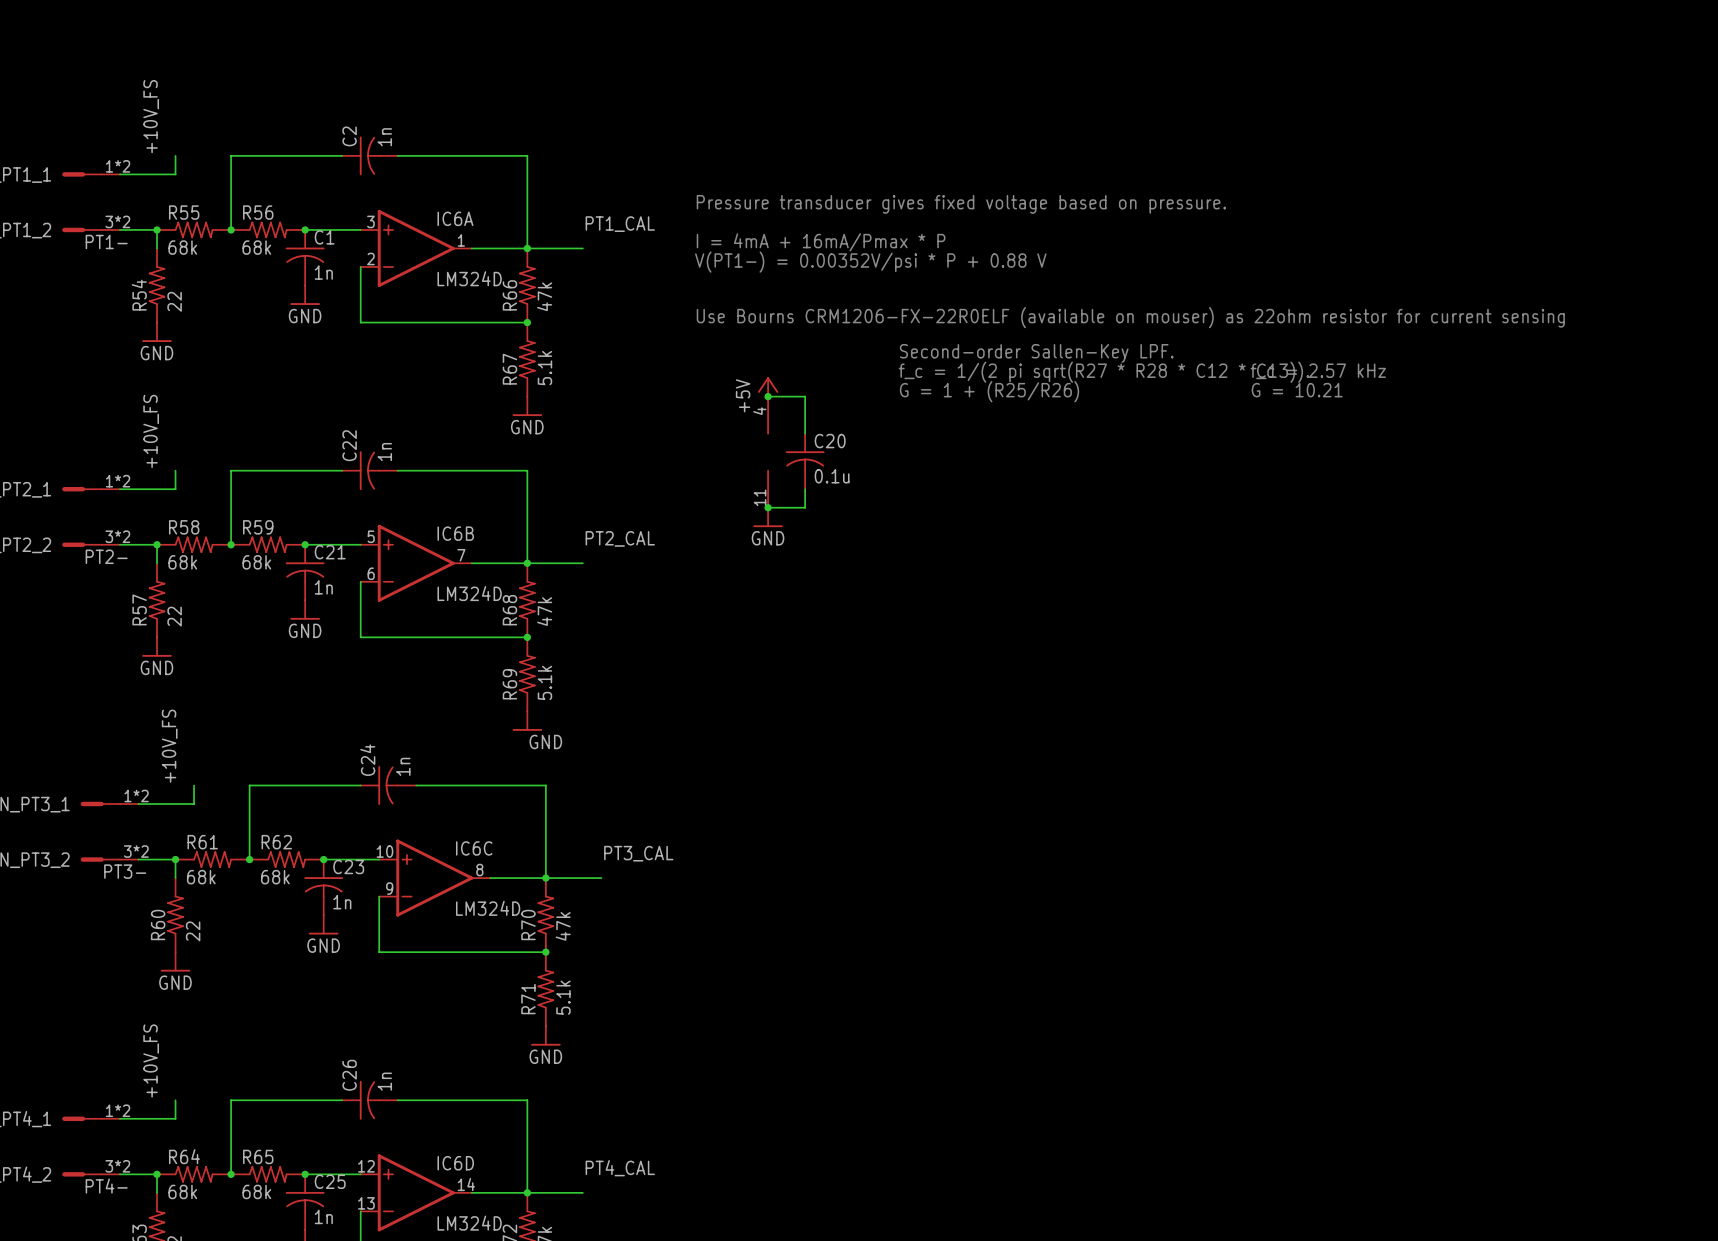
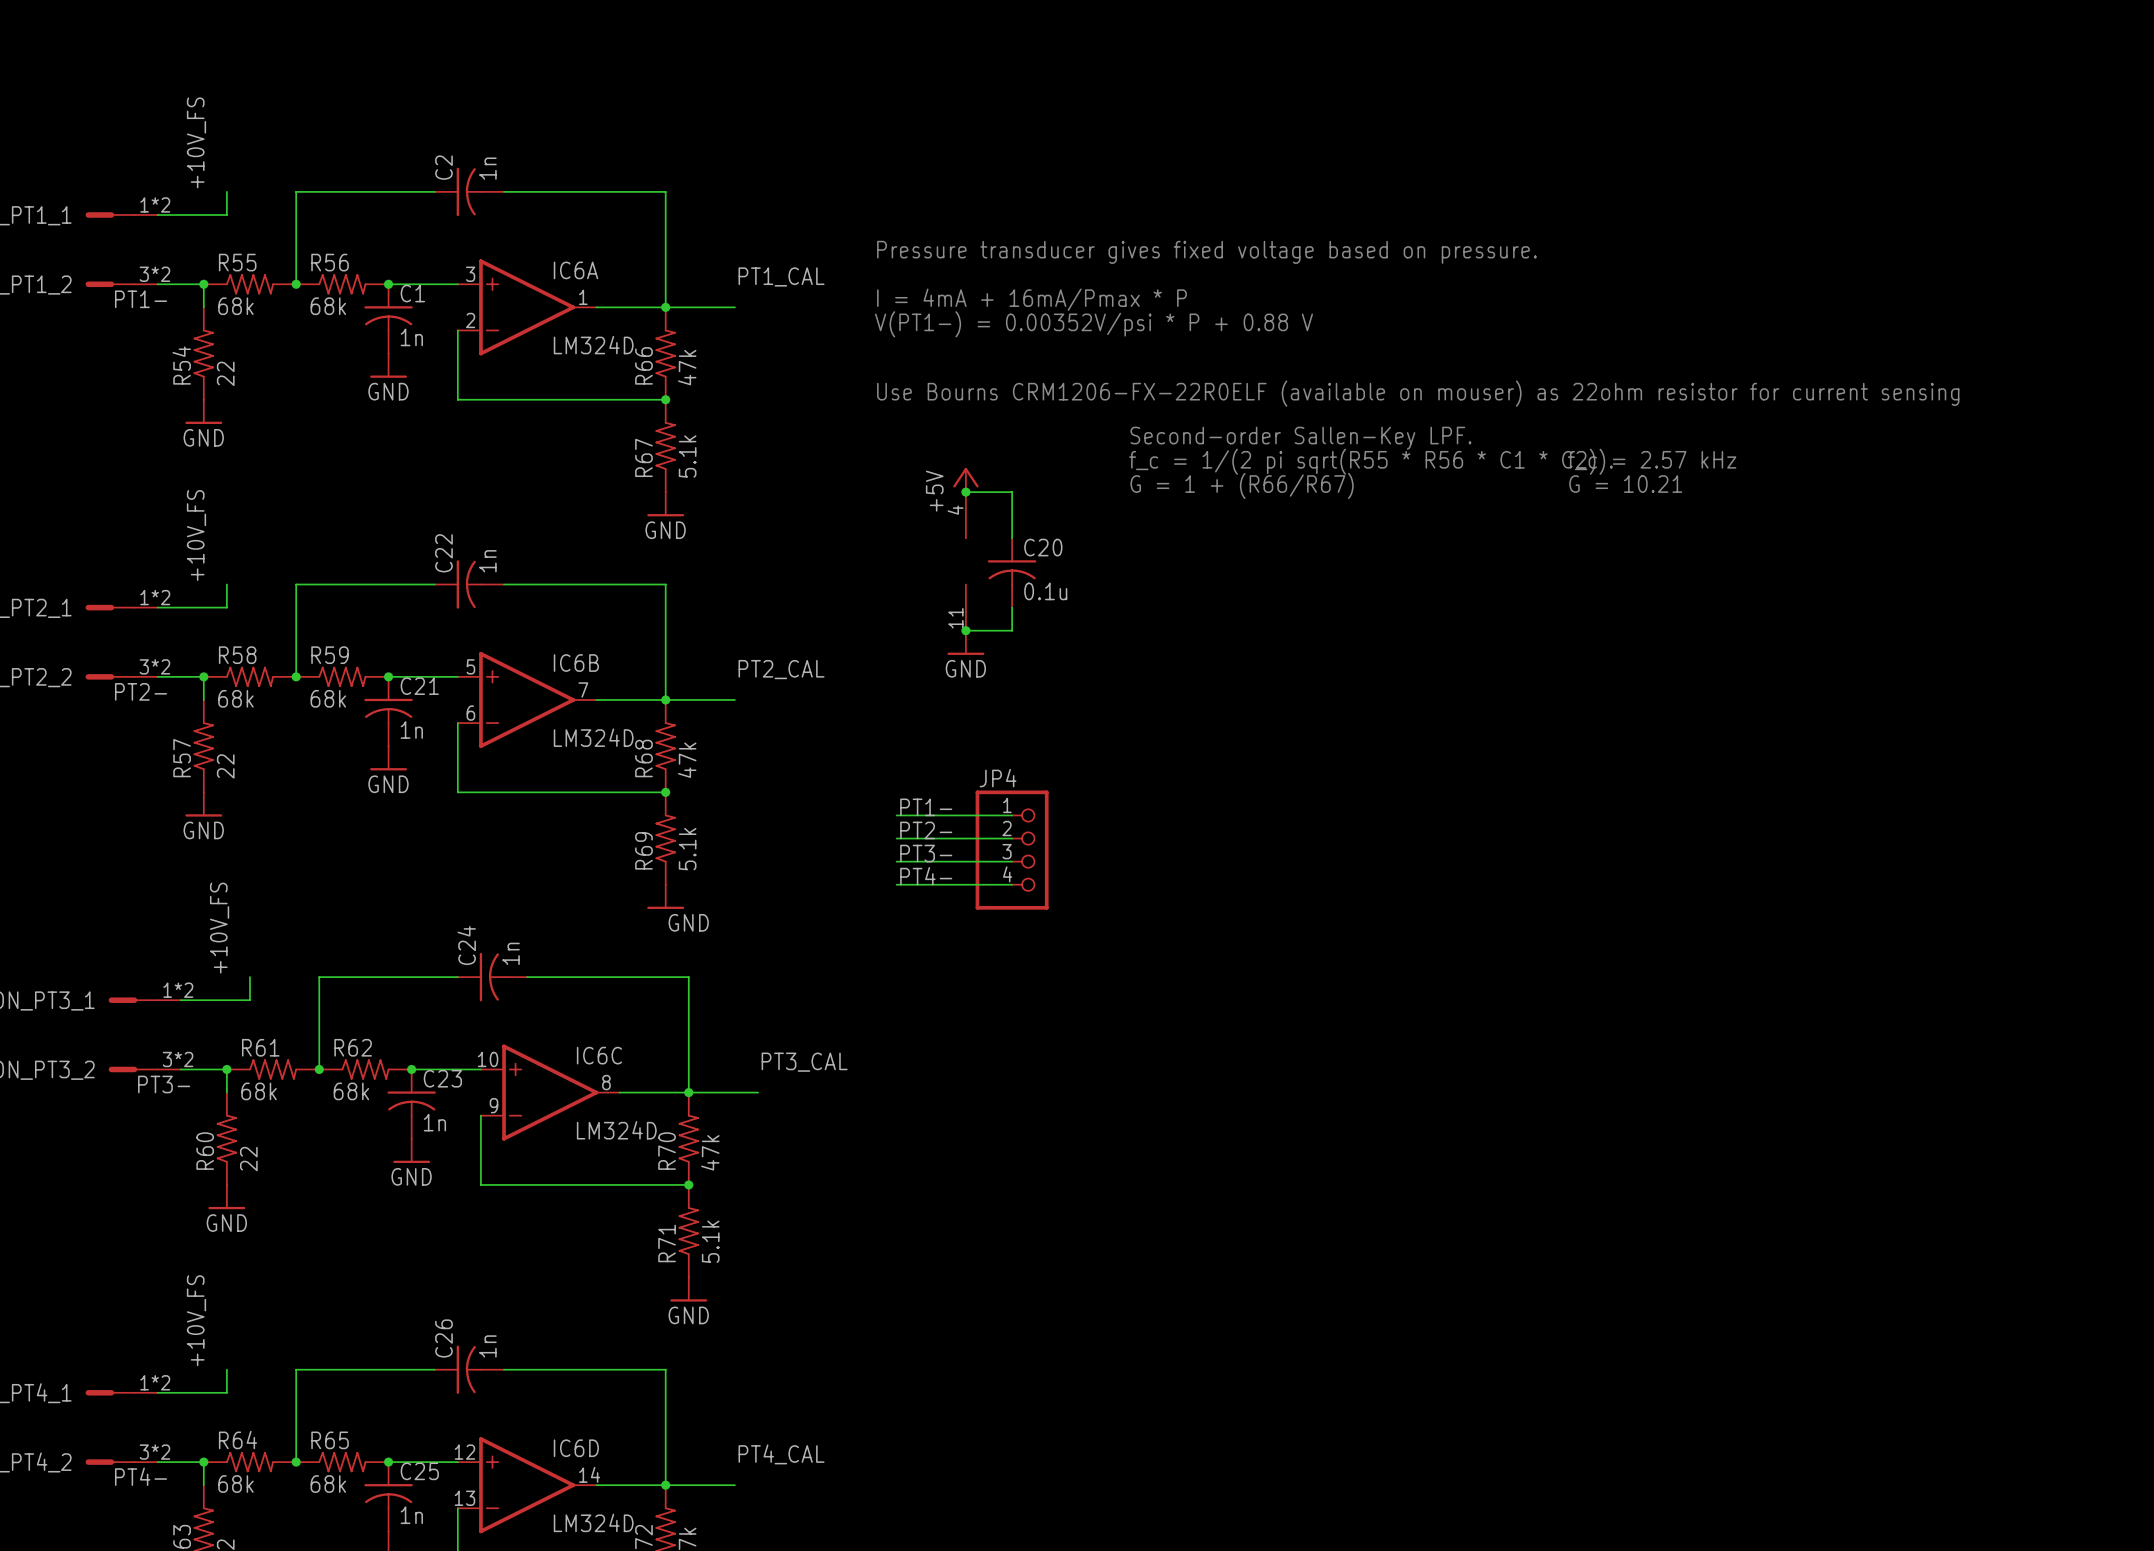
text: f_c = 1/(2 pi sqrt(R27 * R28 * C12 * C13)). (1103, 372) -> f_c = 1/(2 pi sqrt(R55 * R56 * C1 * C2)). (1370, 461)
text: G = 1 + (R25/R26) (989, 391) -> G = 1 + (R66/R67) (1242, 485)
label: none -> PT1- (926, 807)
wire: none -> (896, 815) (1012, 815)
label: none -> PT2- (926, 830)
wire: none -> (896, 838) (1012, 838)
JP4: none -> (1012, 850)
label: none -> PT3- (926, 853)
wire: none -> (896, 861) (1012, 861)
label: none -> PT4- (926, 876)
wire: none -> (896, 884) (1012, 884)

